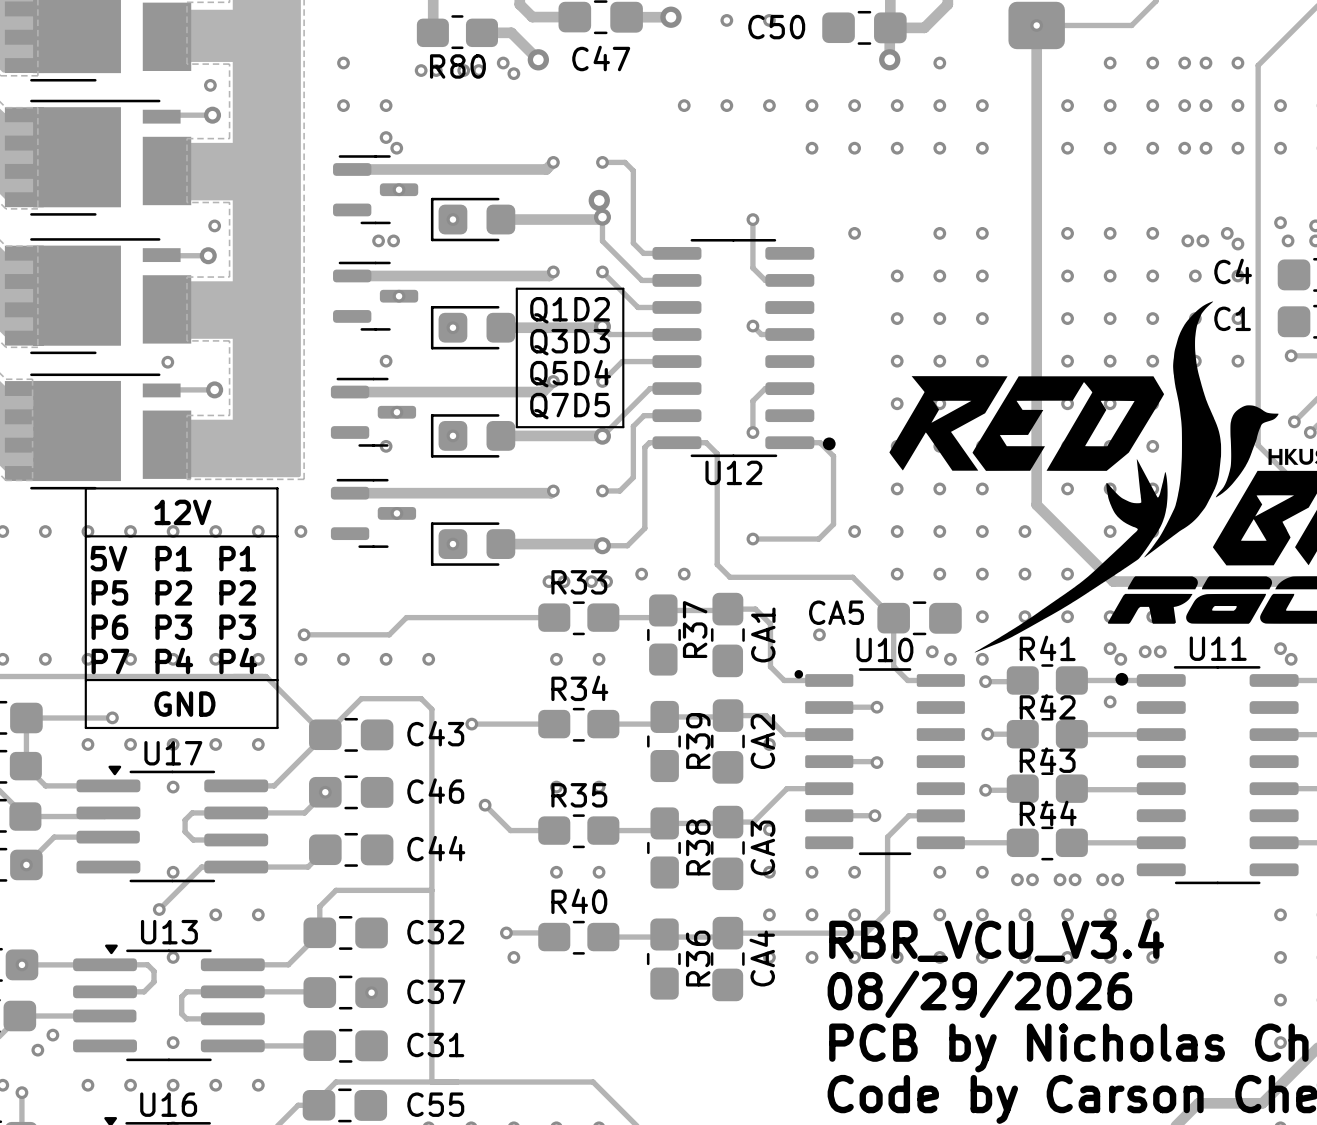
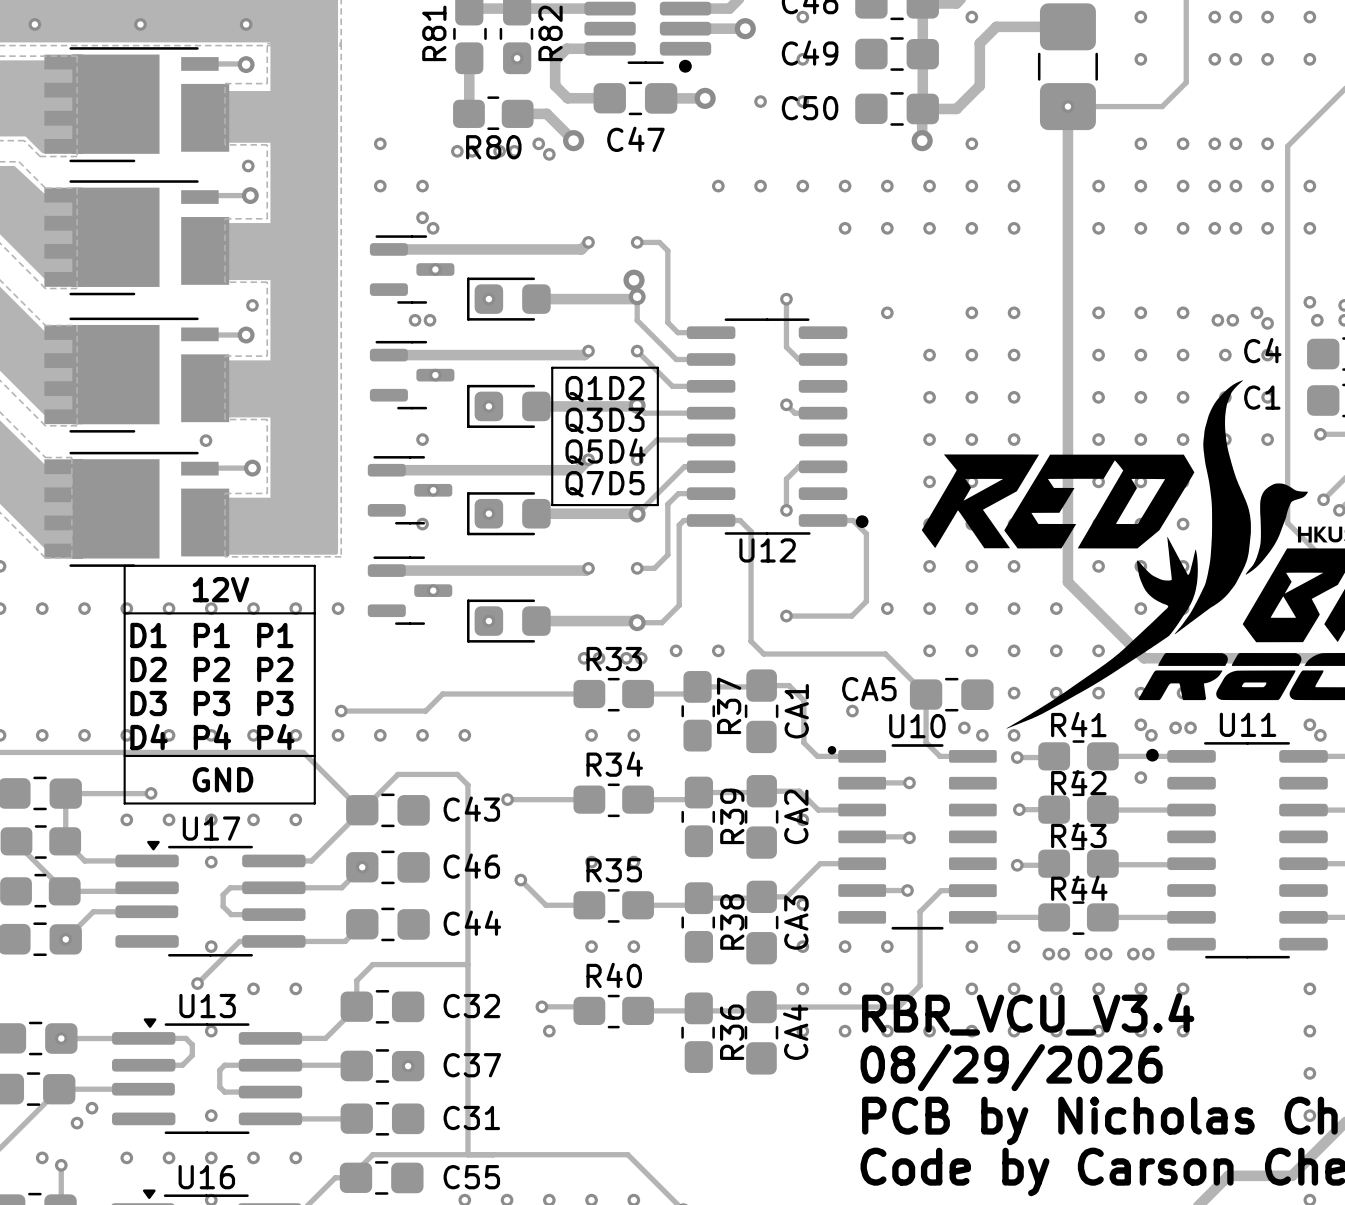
text: 5V (108, 558) -> D1 (148, 635)
text: P5 (109, 592) -> D2 (148, 669)
text: P6 (109, 627) -> D3 (148, 703)
text: P7 (110, 661) -> D4 (149, 737)

